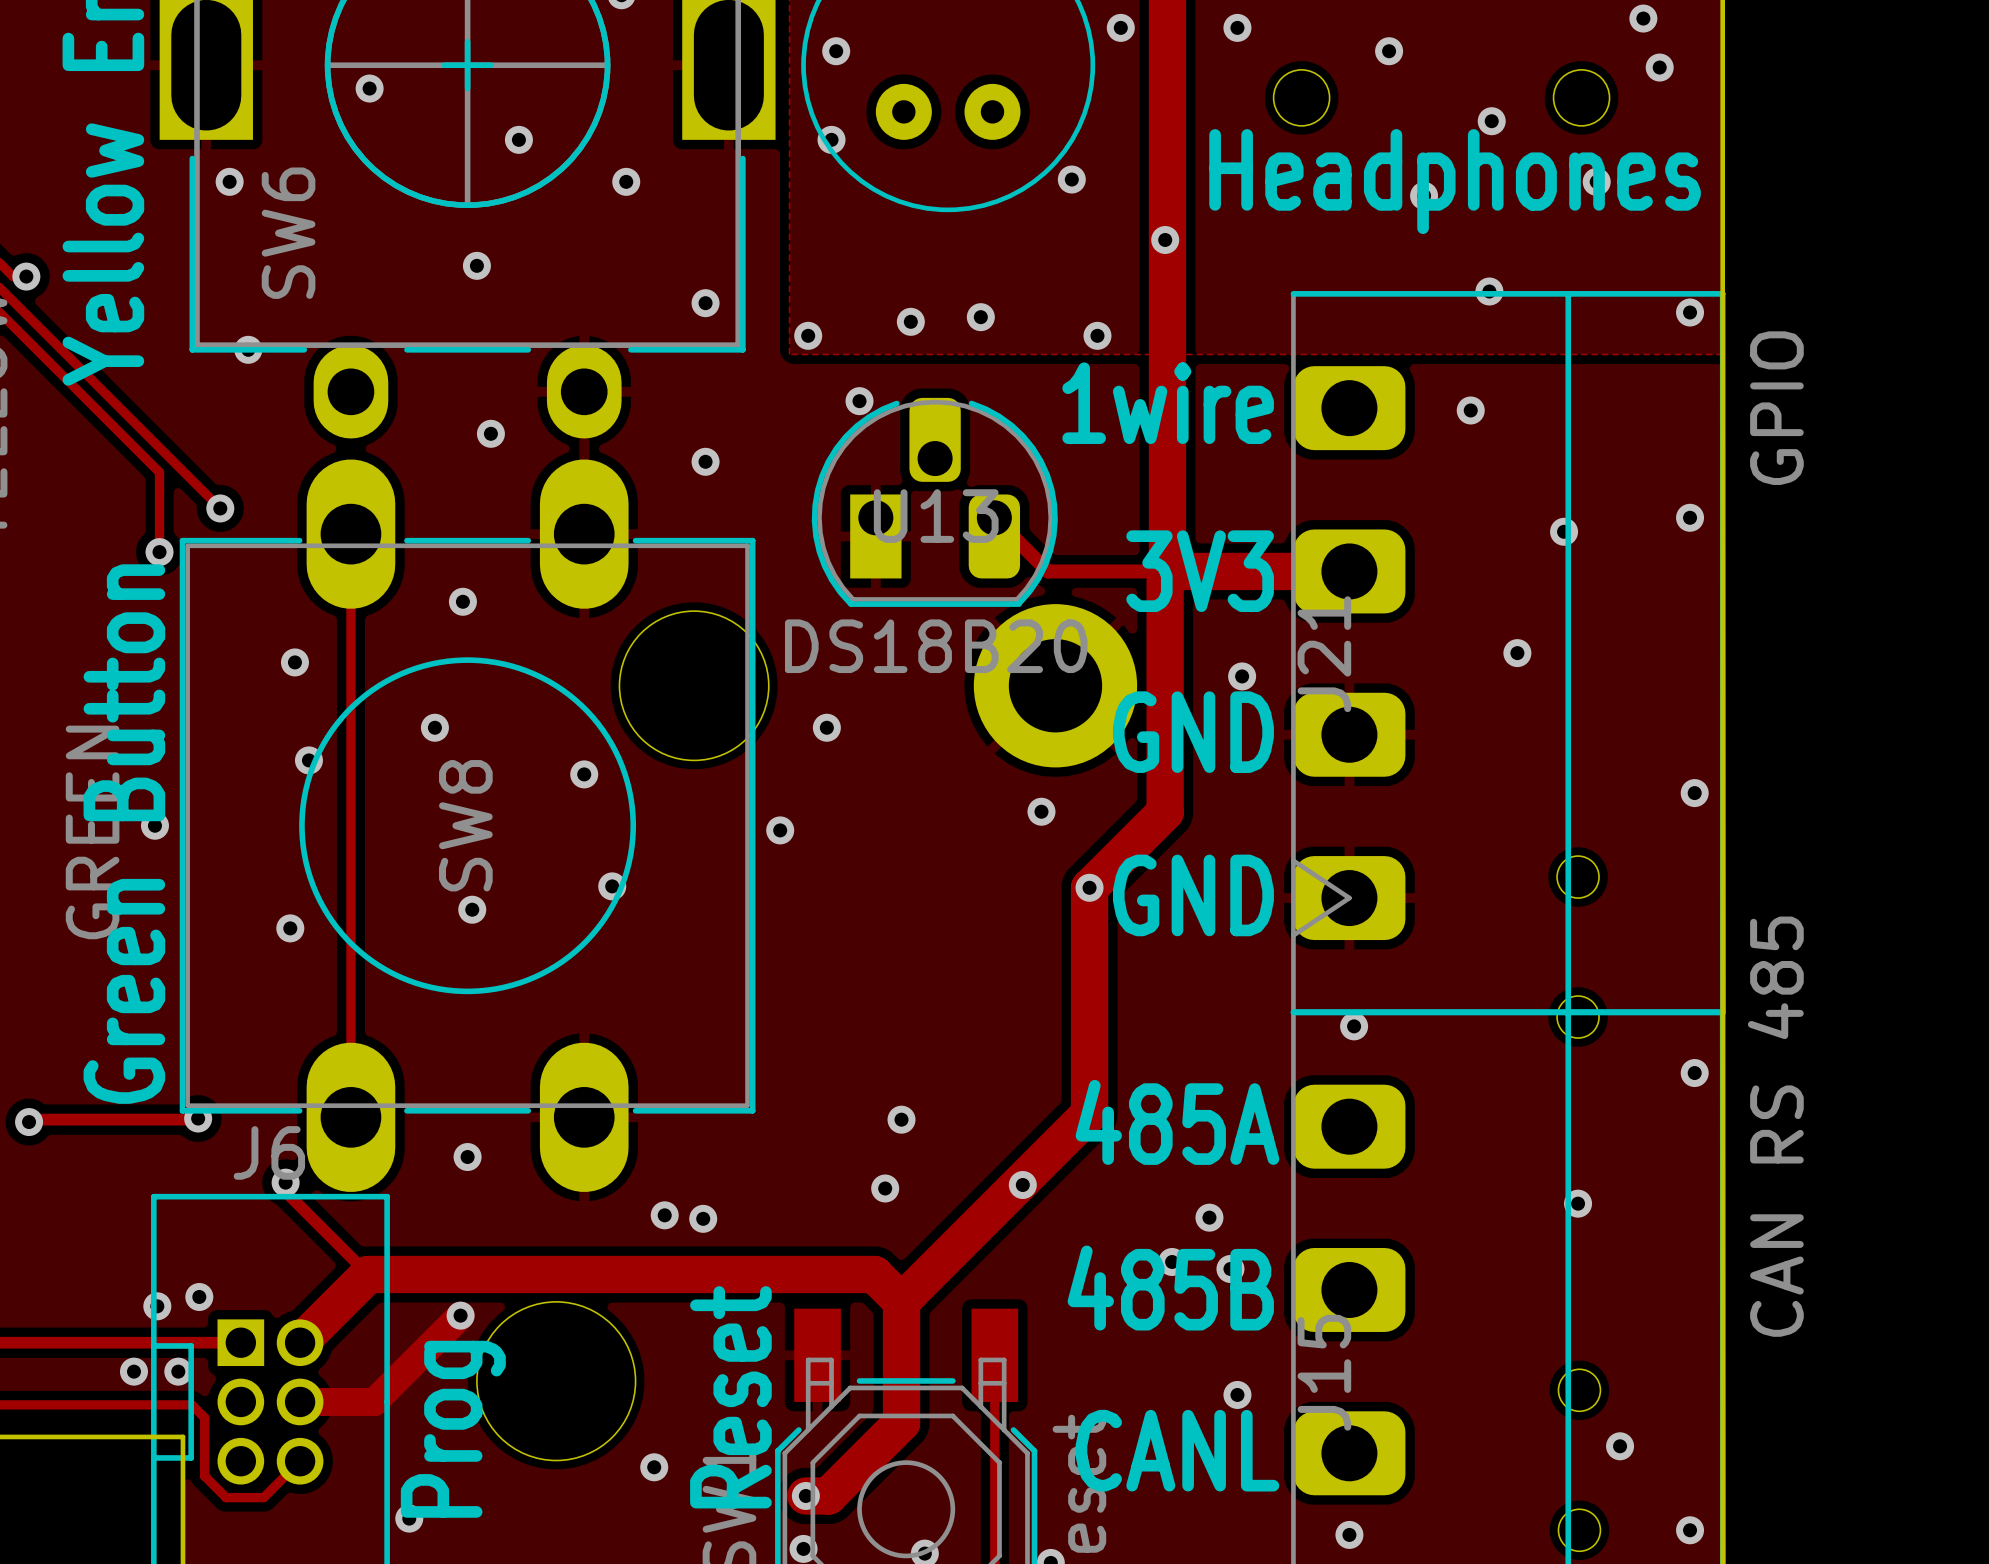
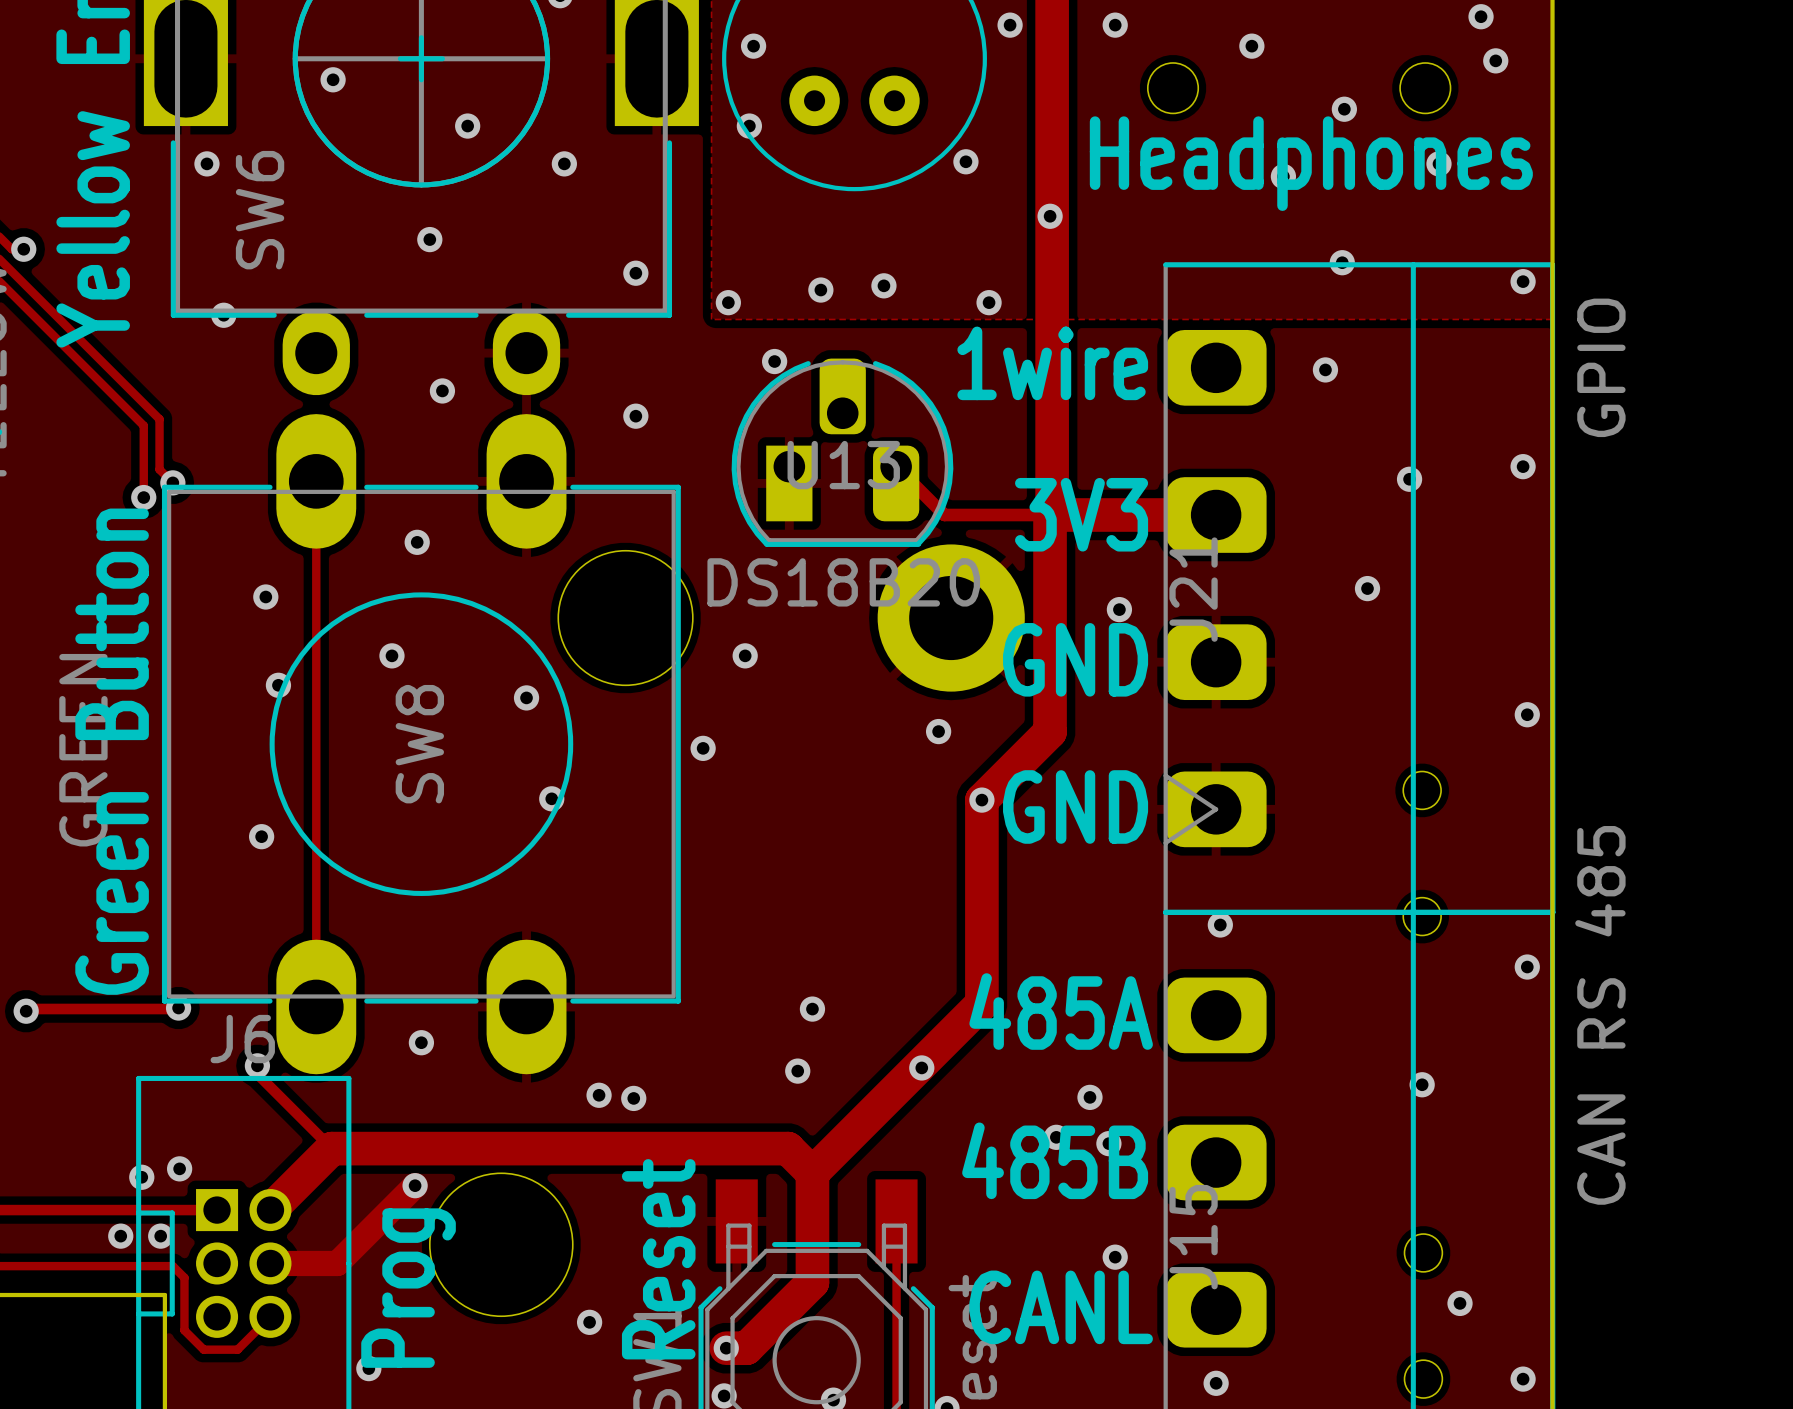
track: (177, 465) (220, 508) -> (159, 419) (159, 469) (172, 482)
via position: (220, 508) -> (172, 482)
via: (154, 825) -> none
via: (472, 909) -> none

